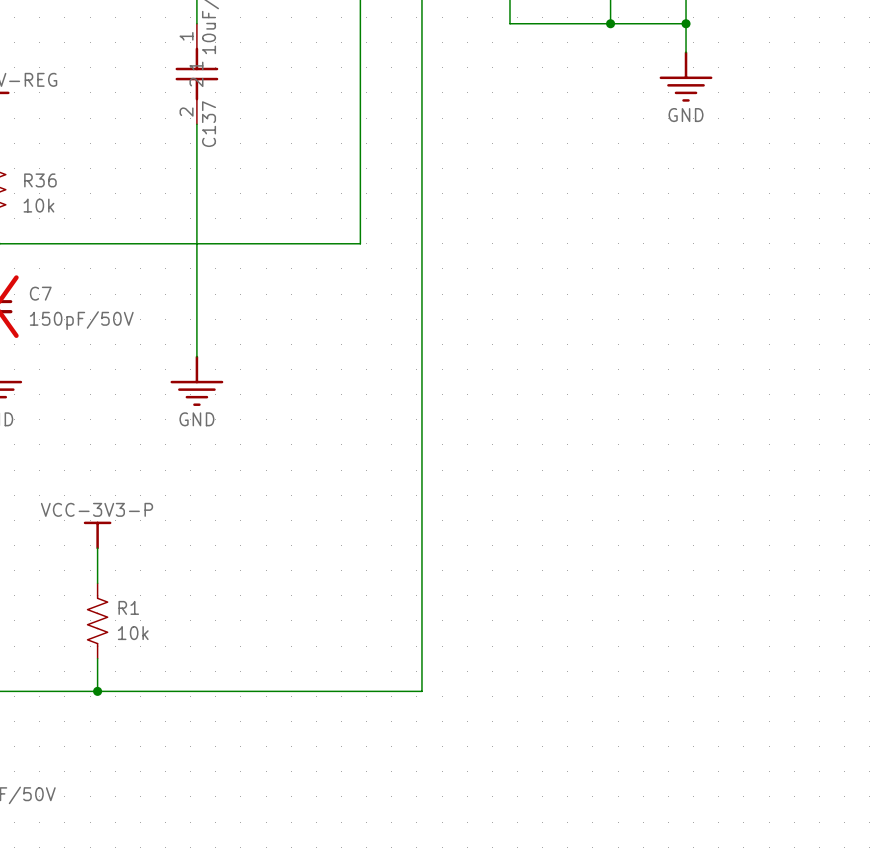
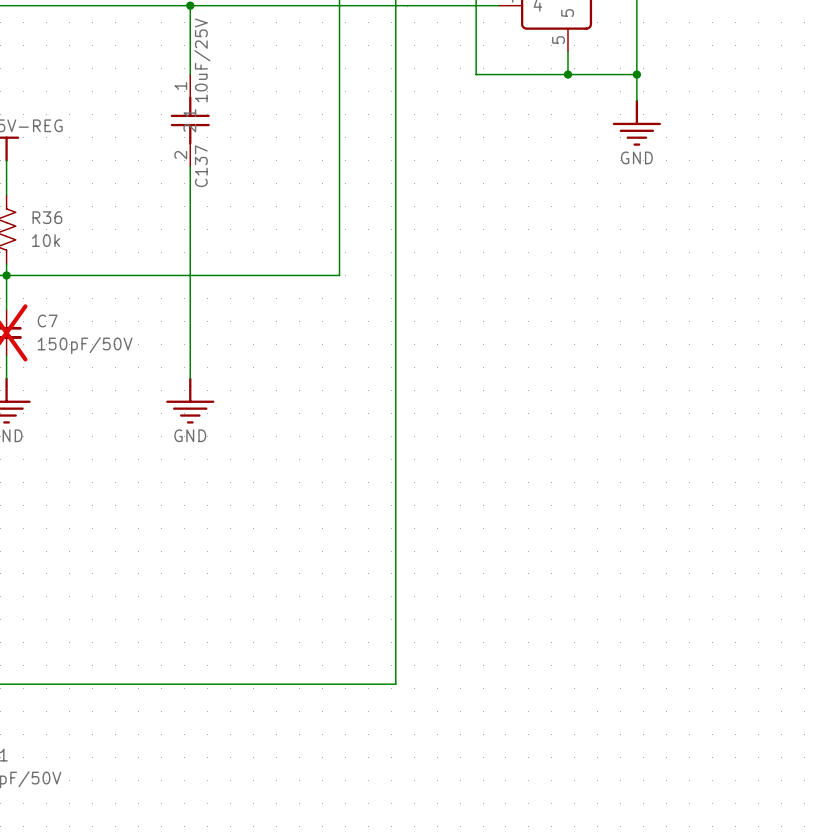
power symbol: VCC-3V3-P (97, 535) -> none
wire: (97, 548) (97, 583) -> none
R1: 10k (97, 620) -> none
wire: (97, 658) (97, 691) -> none
junction: (97, 691) -> none

